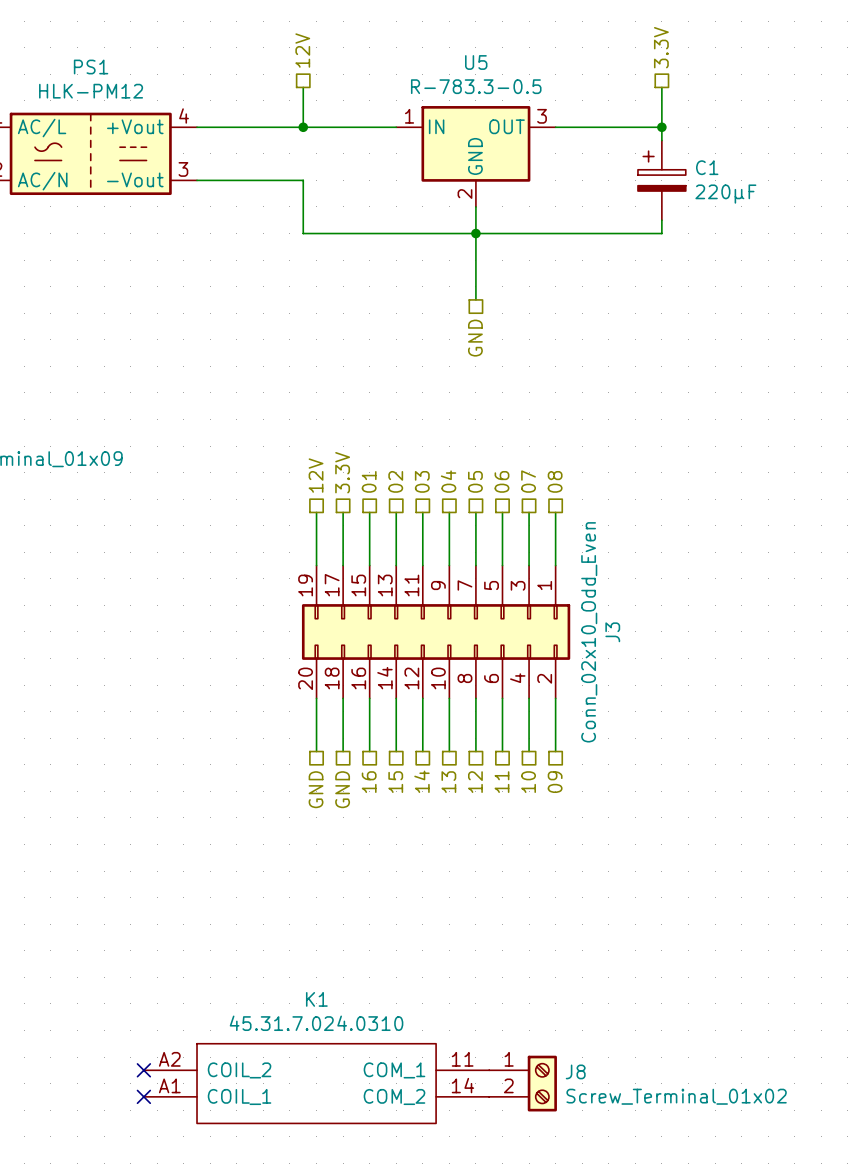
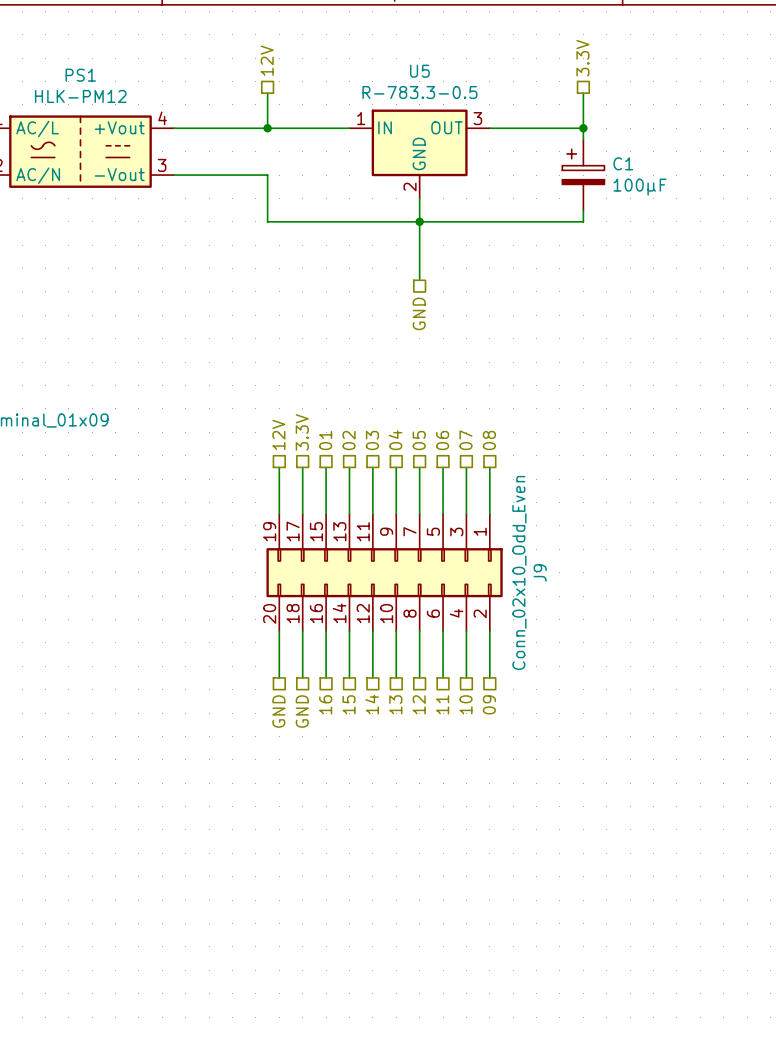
C1 value: 220µF (725, 194) -> 100µF (640, 187)
J3 name: J3 (612, 632) -> J9 (540, 572)
no-connect mark: (143, 1070) -> none
K1: 45.31.7.024.0310 (316, 1083) -> none
J8: Screw_Terminal_01x02 (523, 1083) -> none
no-connect mark: (143, 1096) -> none

